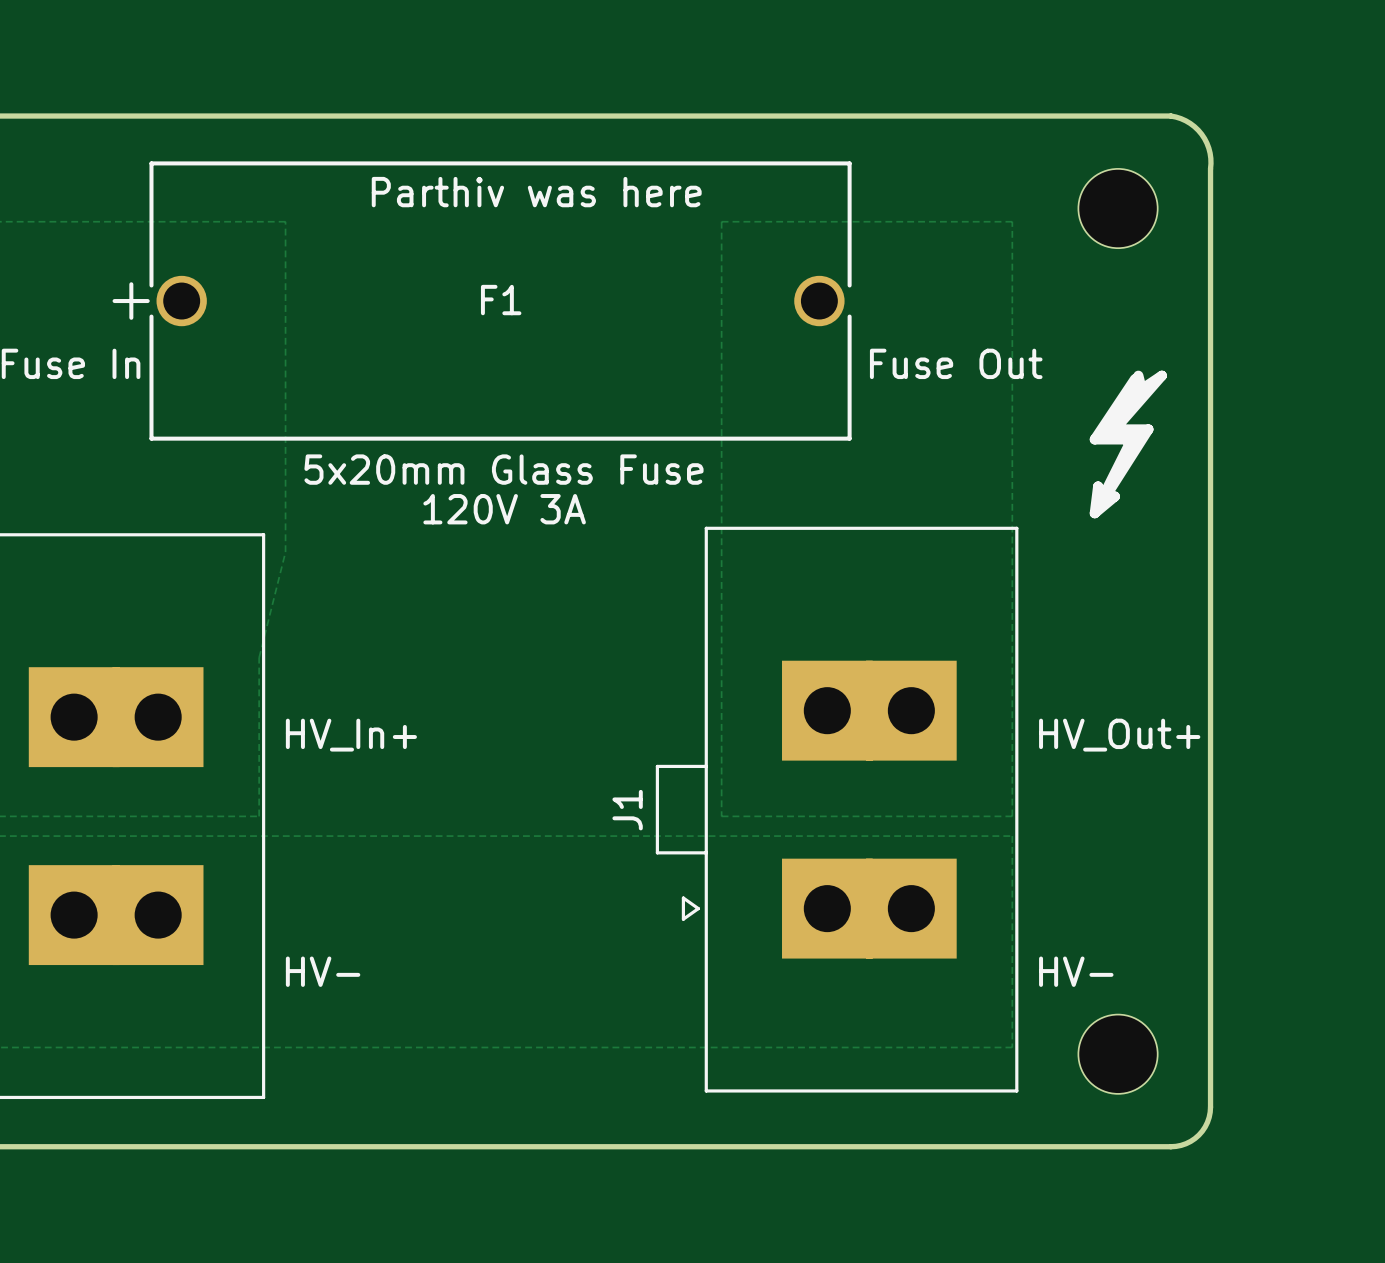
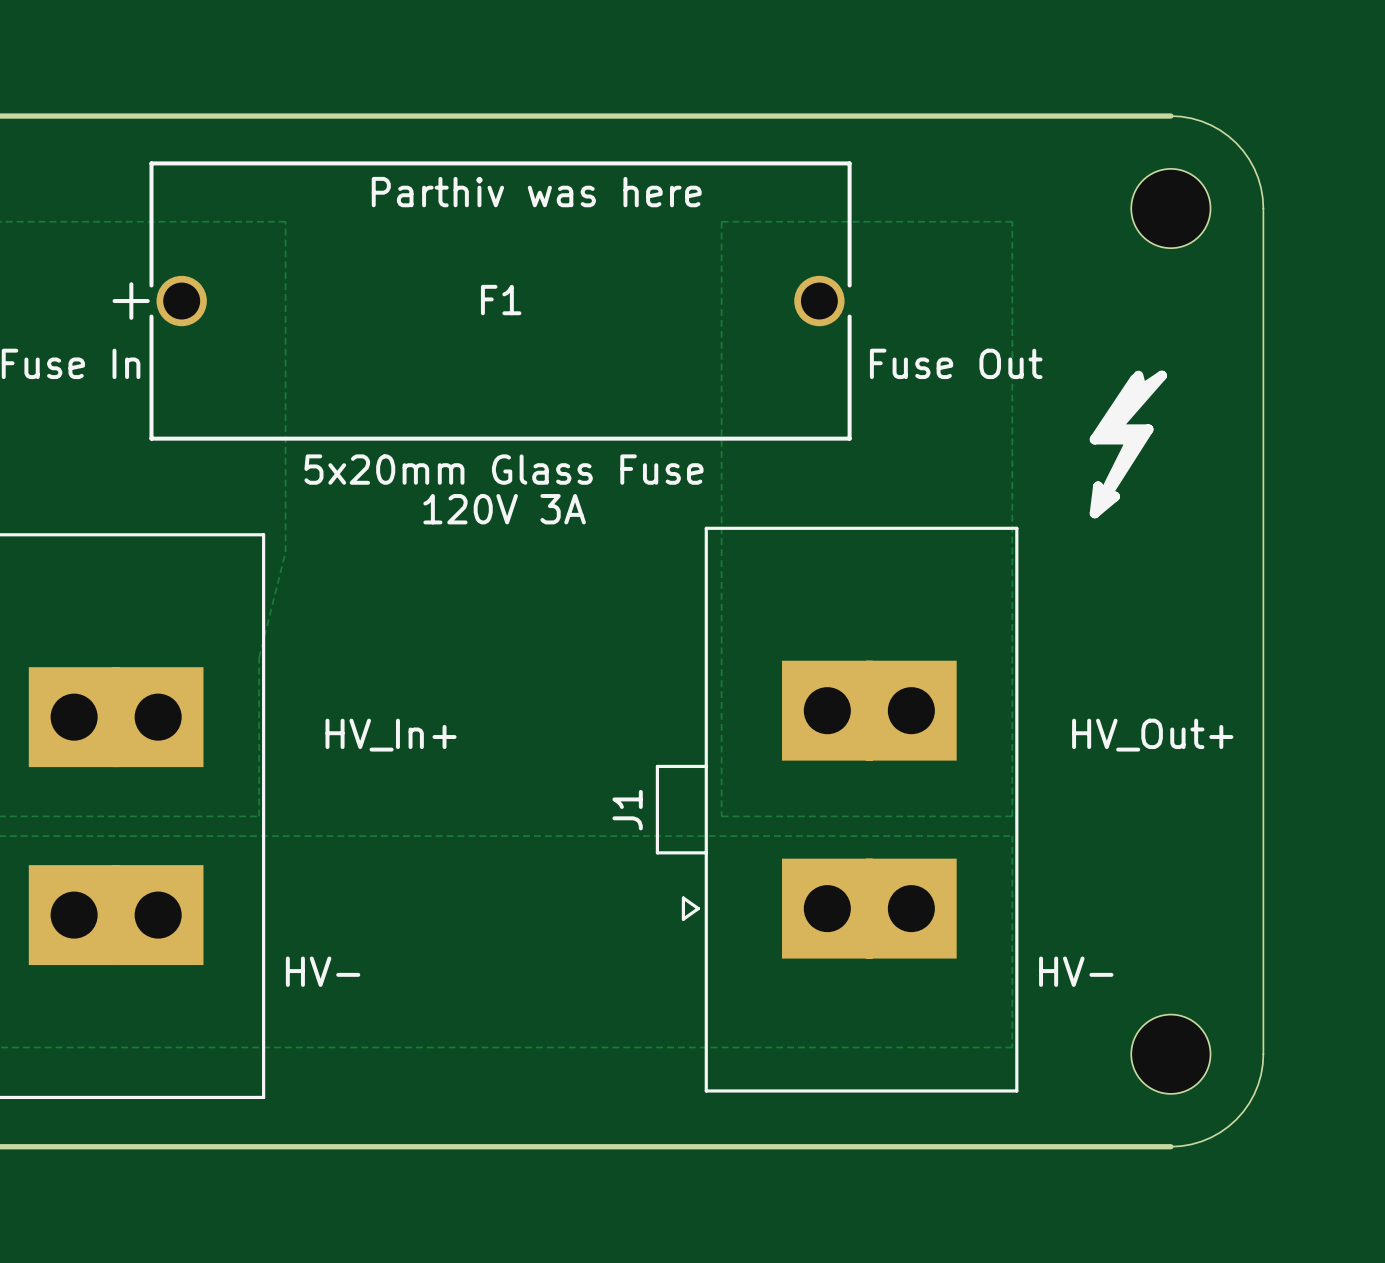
board edge: (1170, 116) (1185, 120) (1198, 130) (1206, 143) (1210, 163) (1210, 1107) (1207, 1122) (1198, 1135) (1186, 1143) (1170, 1146) -> (1170, 116) (1201, 121) (1220, 130) (1236, 143) (1254, 168) (1261, 187) (1263, 208) (1262, 1064) (1254, 1094) (1243, 1111) (1228, 1126) (1201, 1141) (1170, 1146)
part position: (1118, 208) -> (1170, 208)
text position: HV_In+ (351, 735) -> HV_In+ (391, 735)
text position: HV_Out+ (1119, 735) -> HV_Out+ (1152, 735)
part position: (1118, 1054) -> (1170, 1054)

